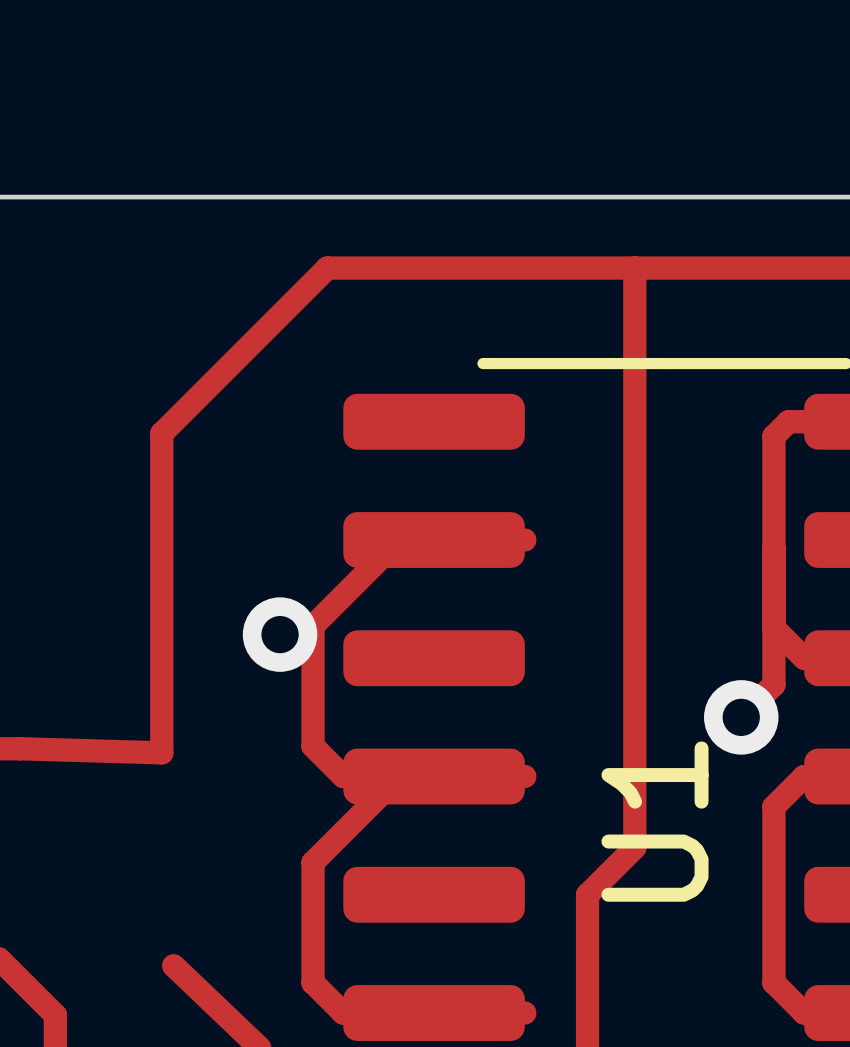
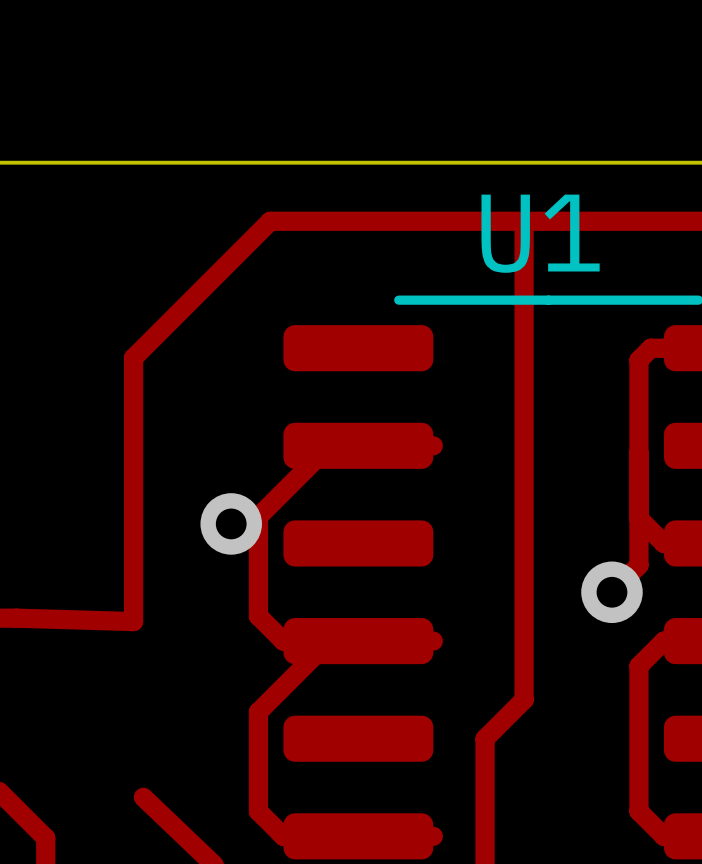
U1 name rotation: 0° (654, 821) -> 90° clockwise (540, 233)
U1 name position: U1 (654, 821) -> U1 (540, 233)

